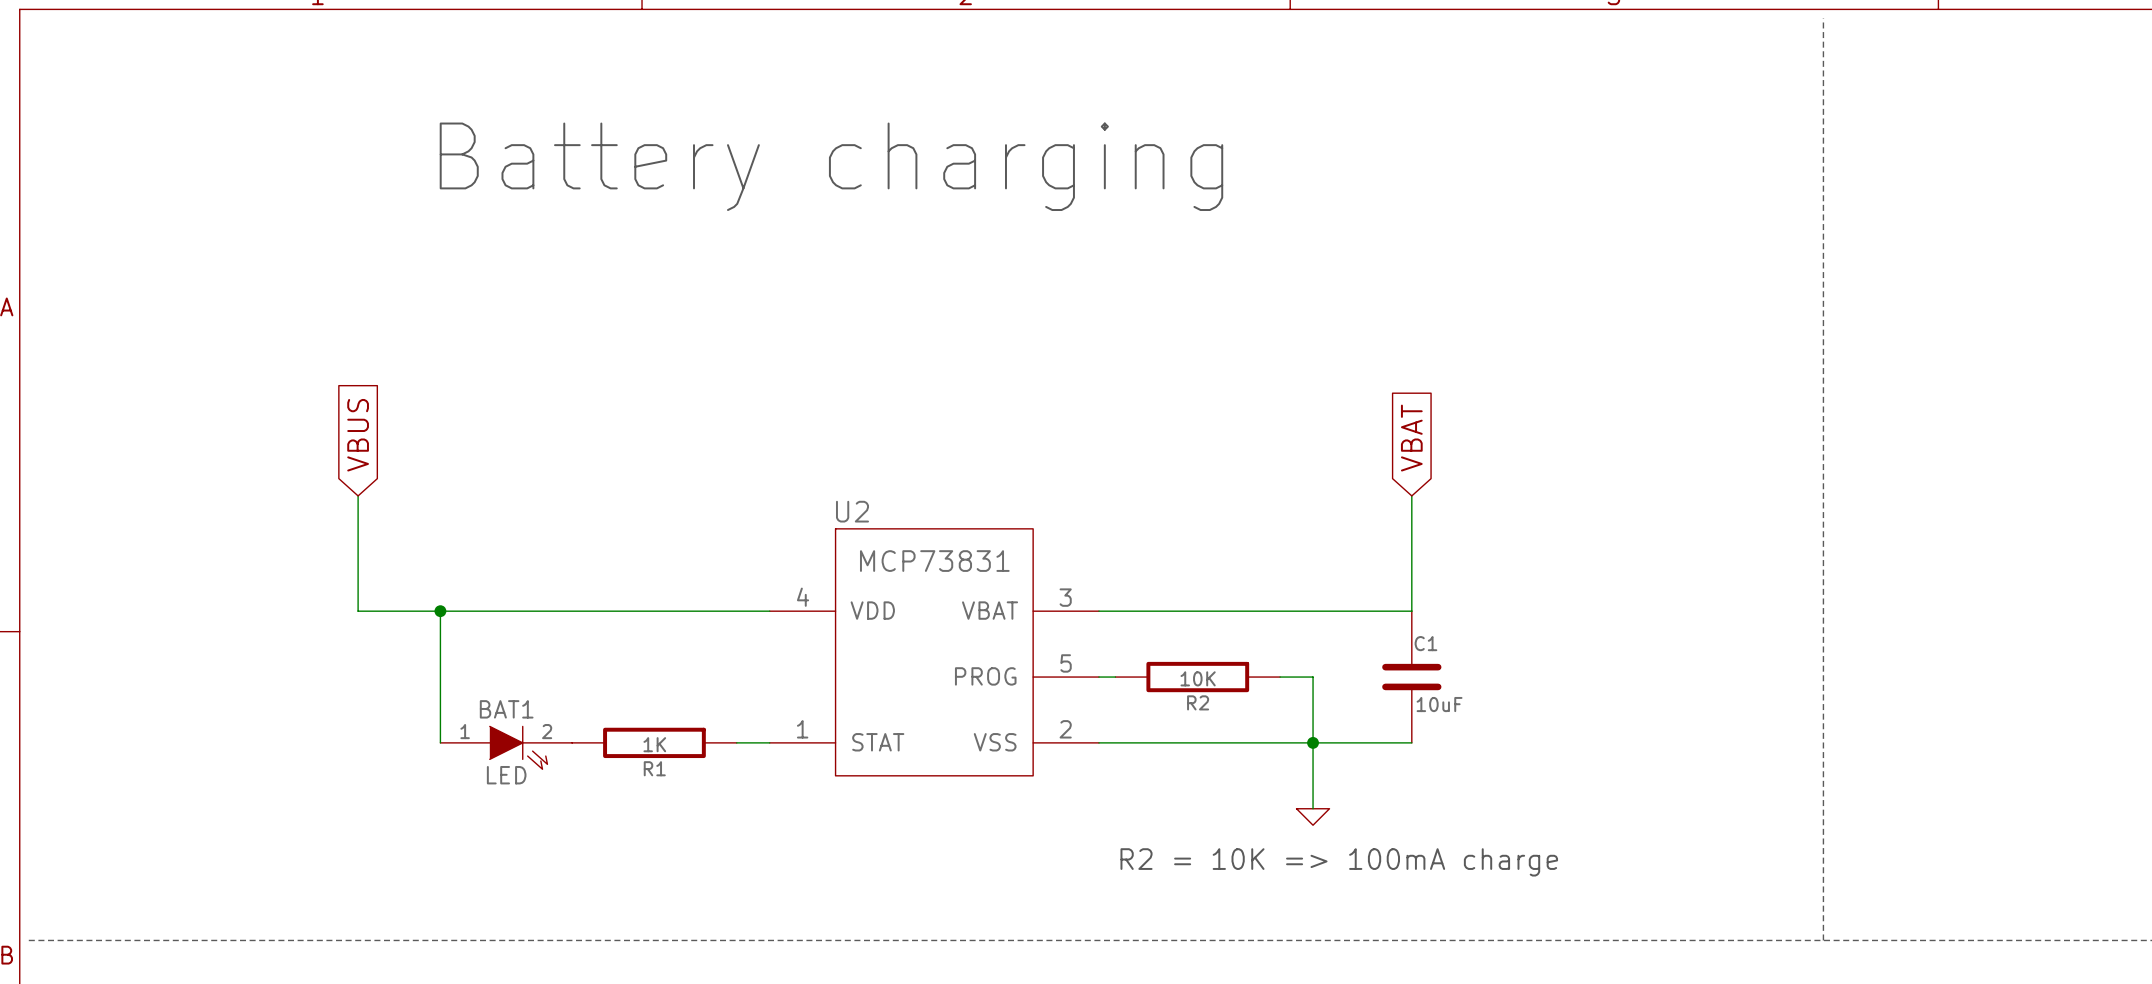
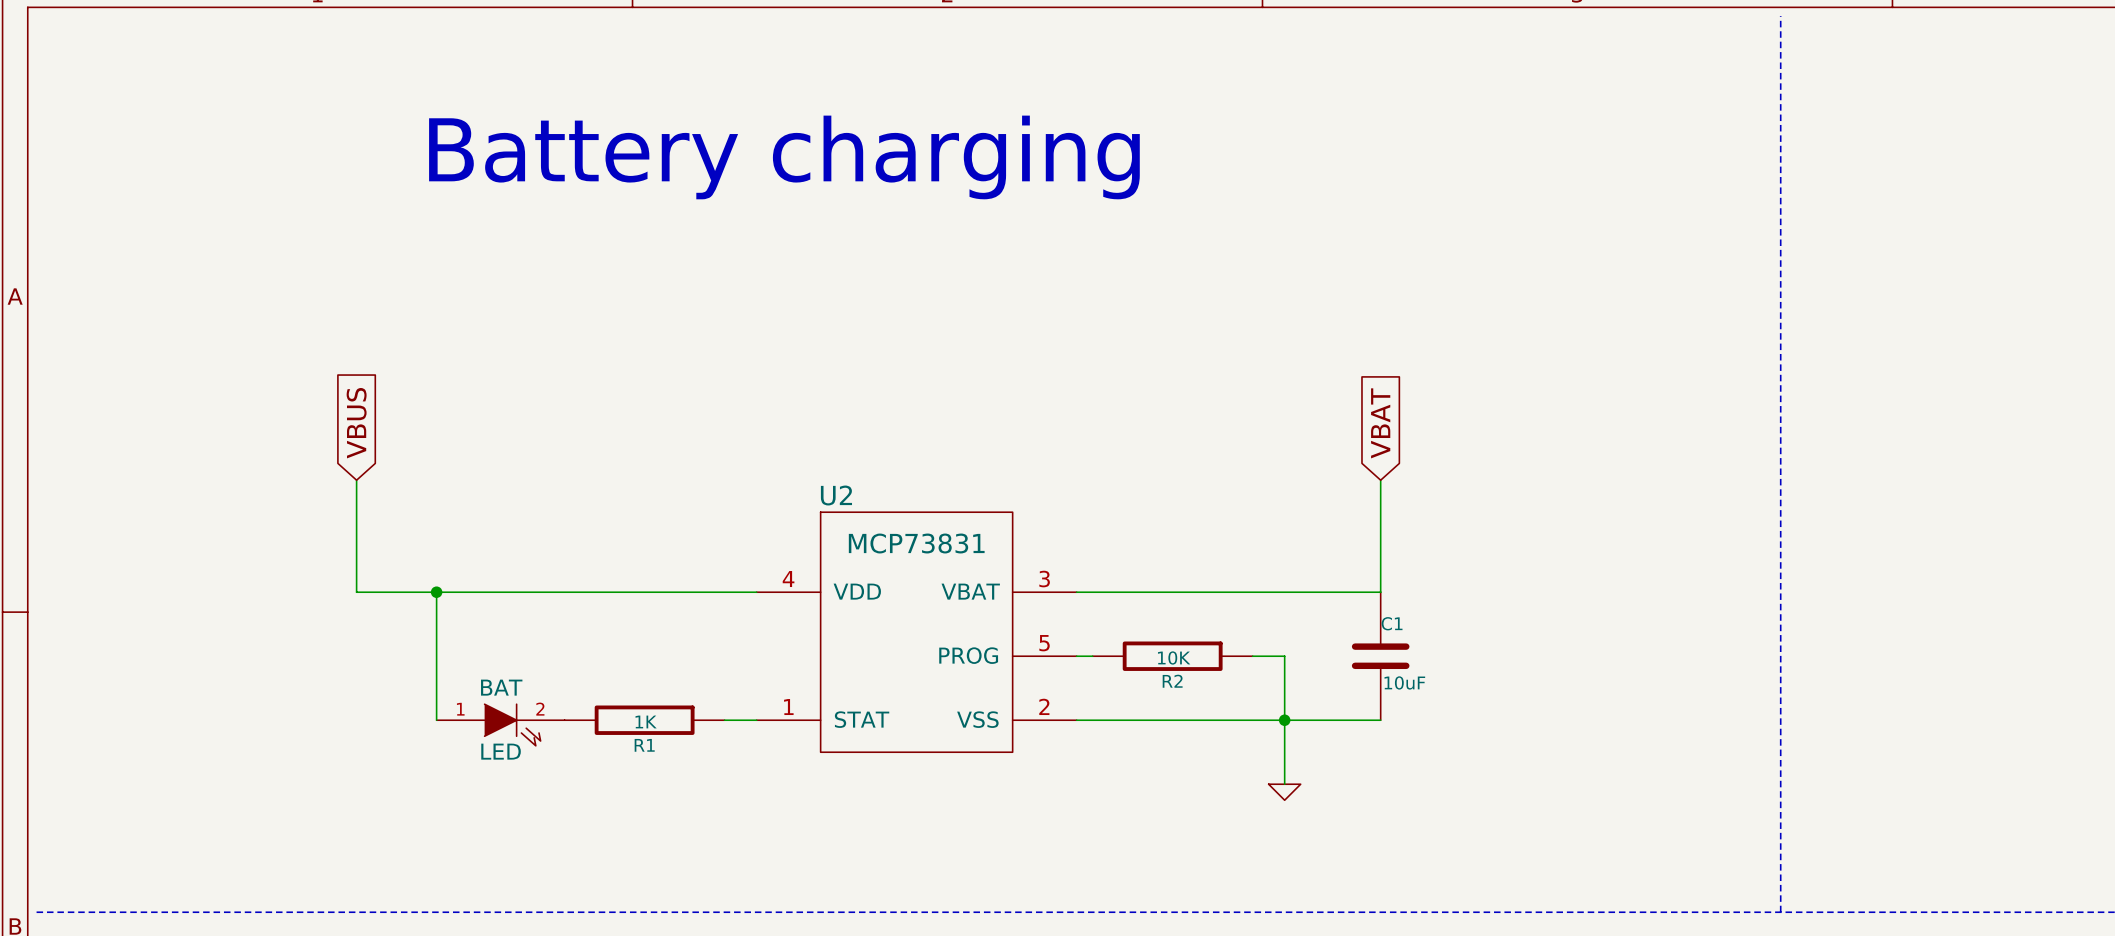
BAT1 name: BAT1 (506, 709) -> BAT (501, 687)
text: R2 = 10K => 100mA charge (1339, 862) -> none

